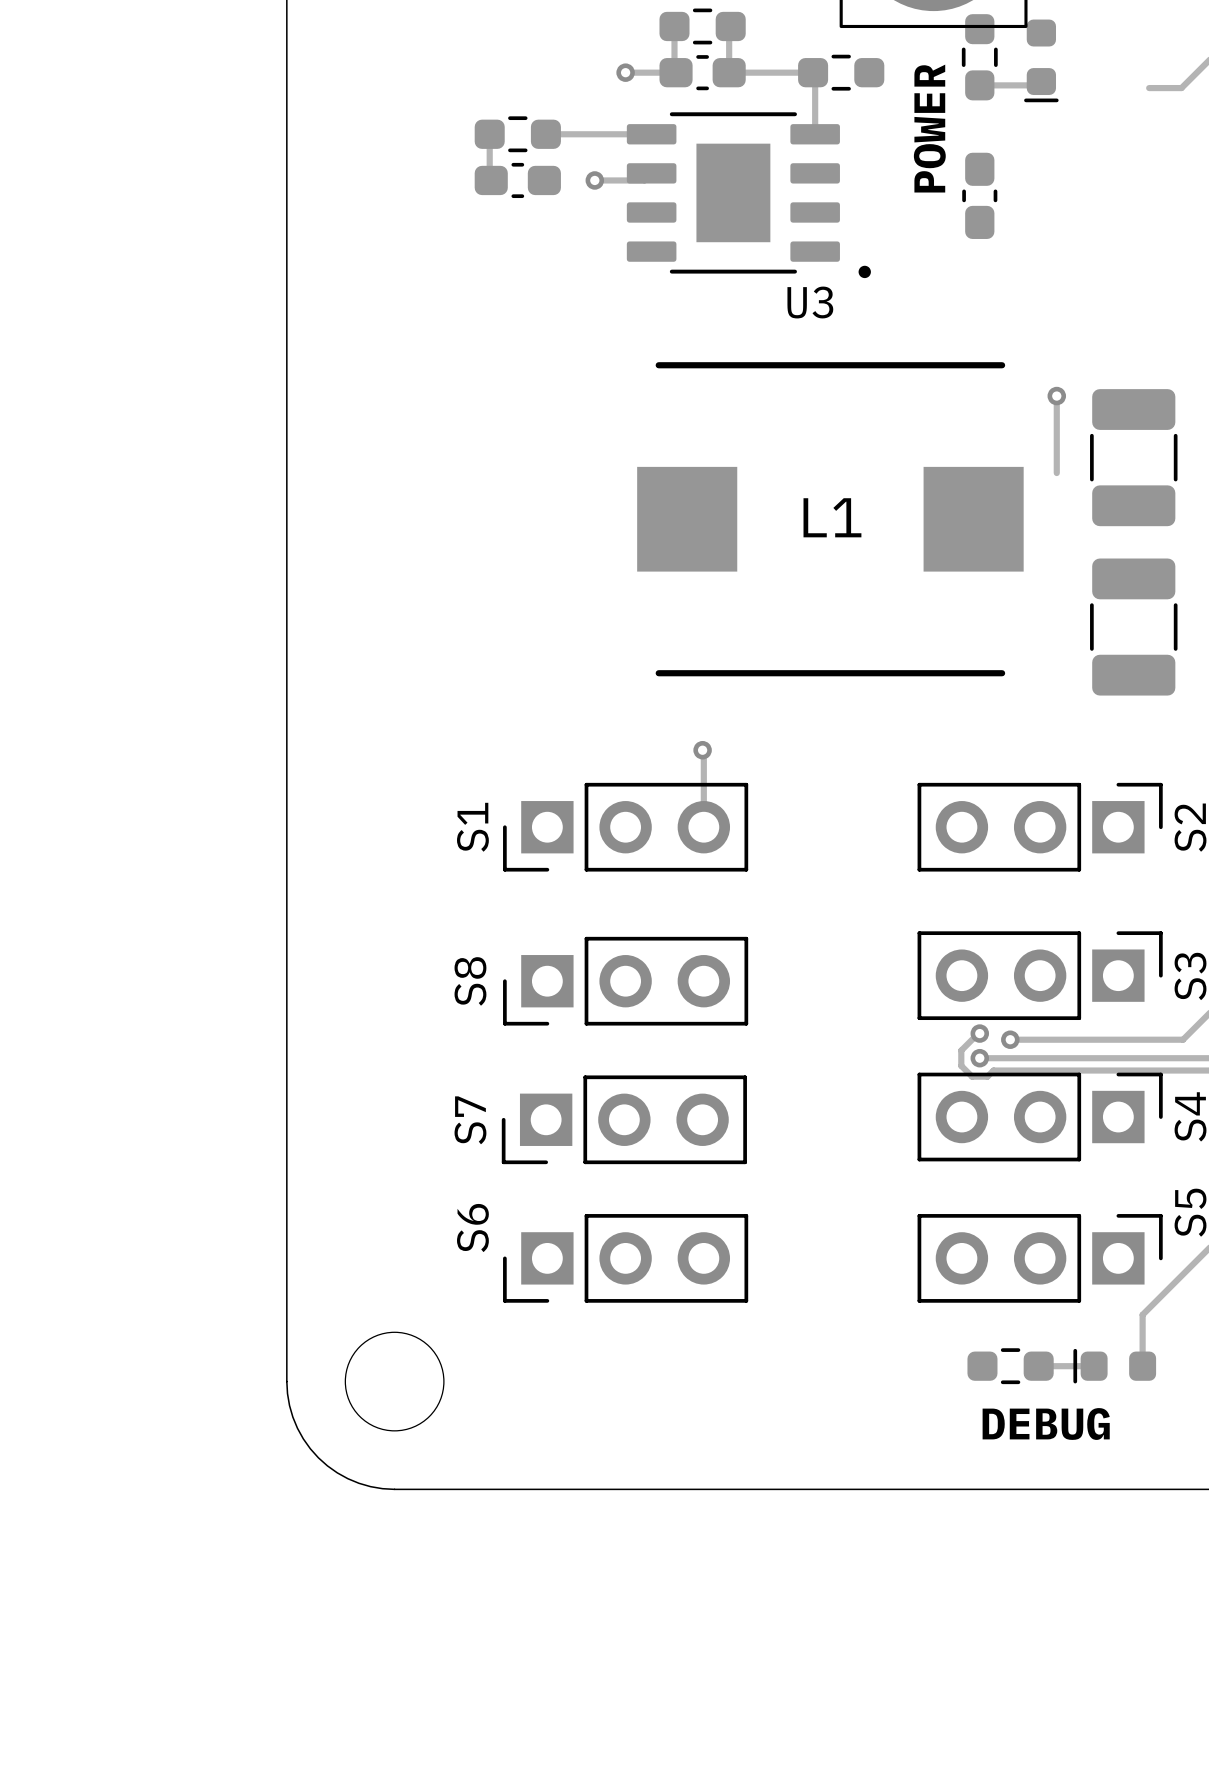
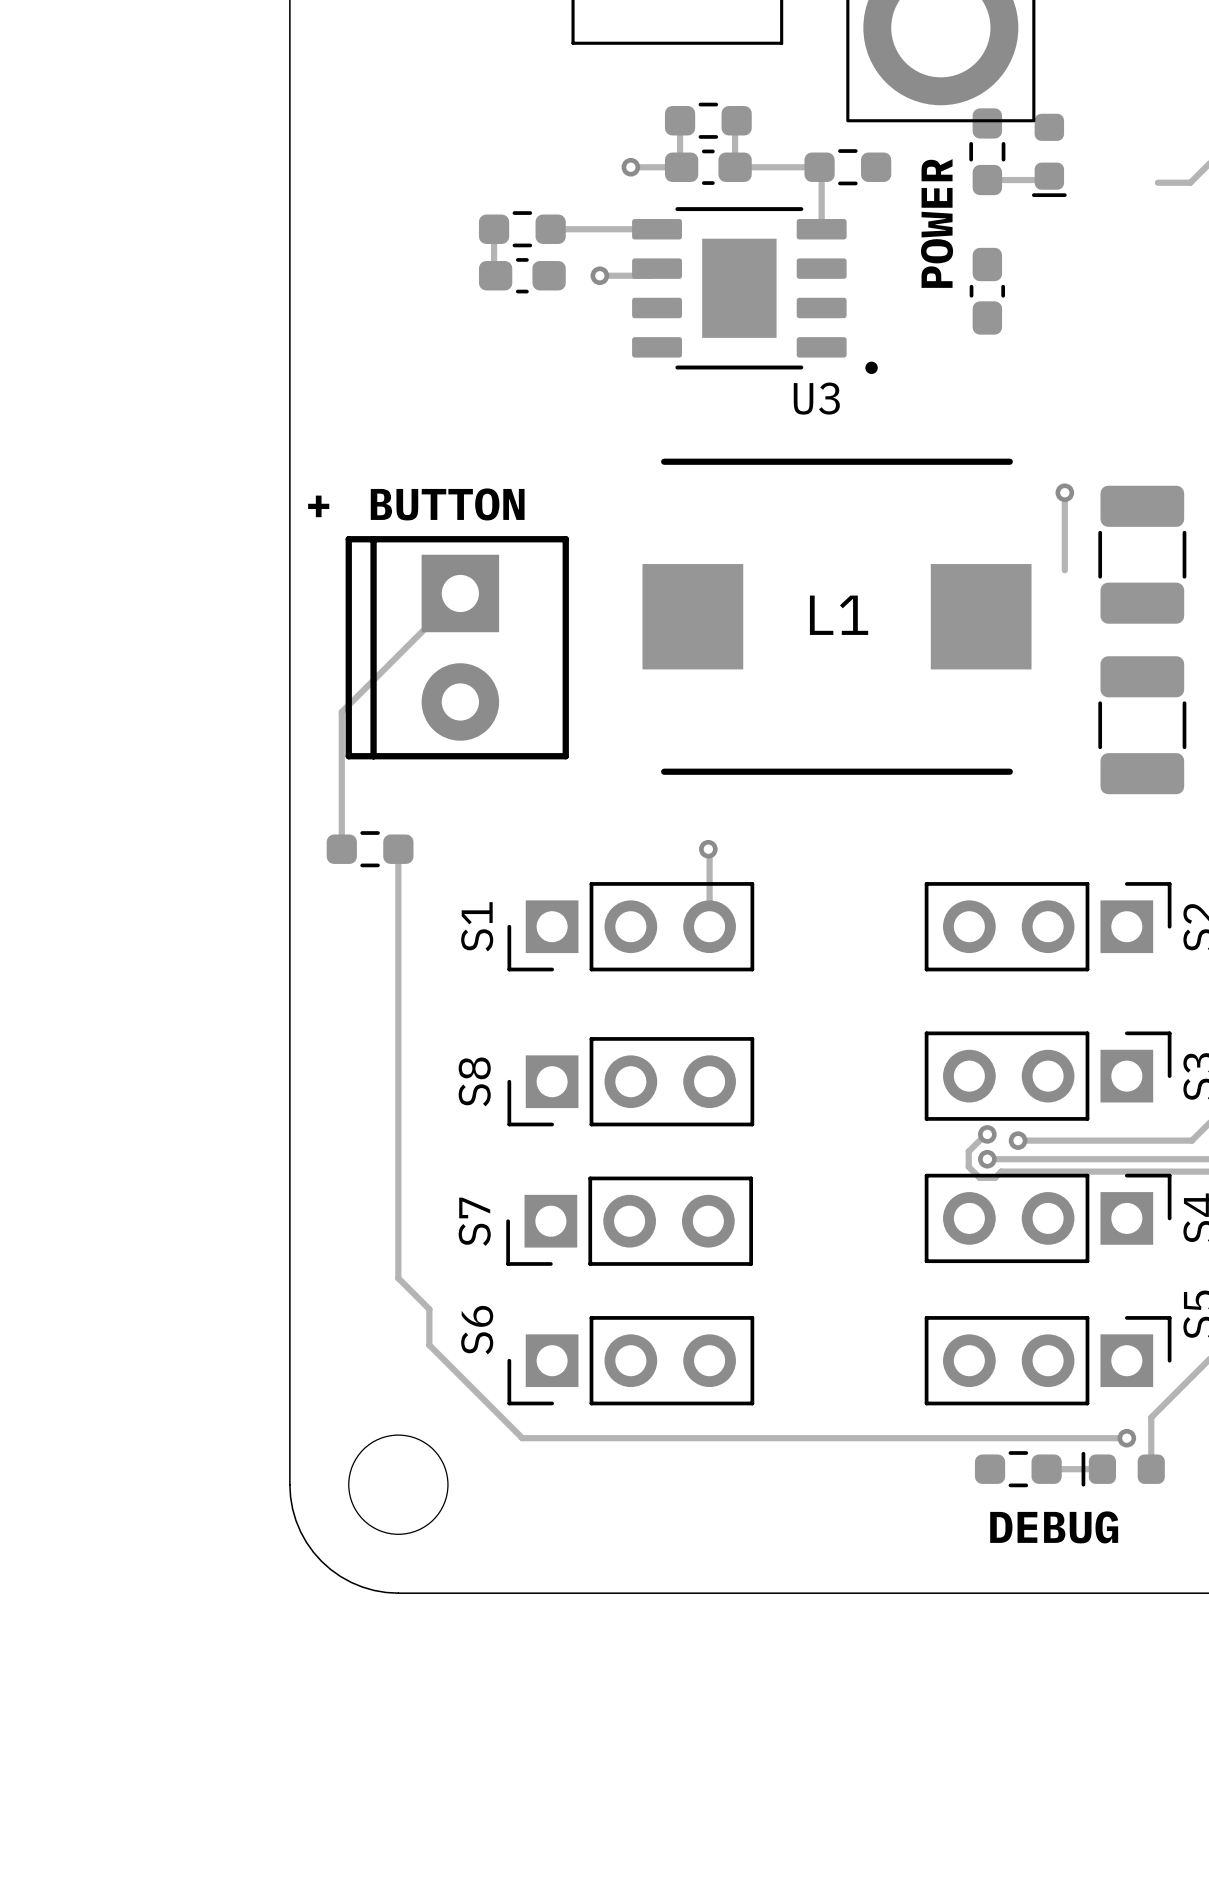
text: none -> BUTTON (447, 504)
text: none -> + (318, 506)
track: none -> (460, 593) (341, 712) (341, 849)
part: none -> (457, 647)
part: none -> (370, 849)
track: none -> (398, 849) (398, 1278) (429, 1309) (429, 1345) (522, 1438) (1126, 1438)
via: none -> (1126, 1438)

